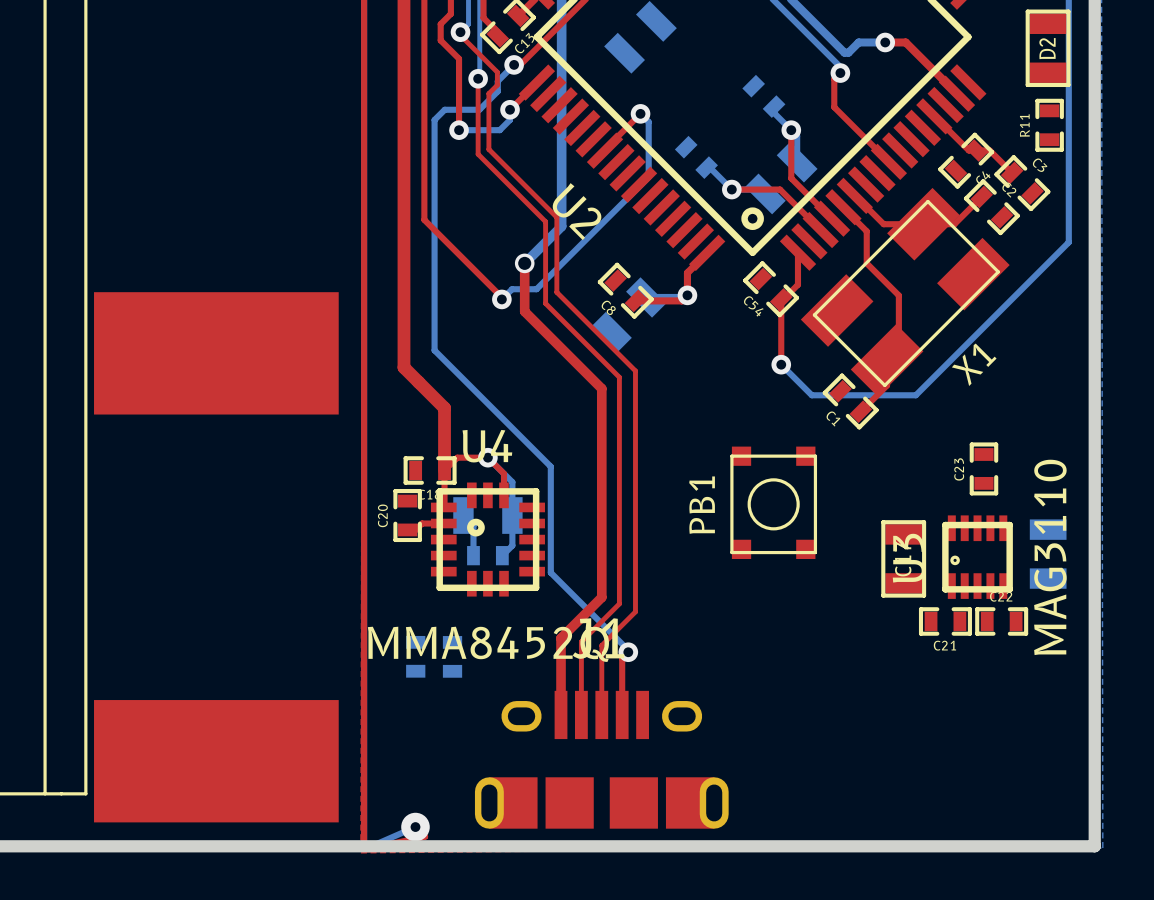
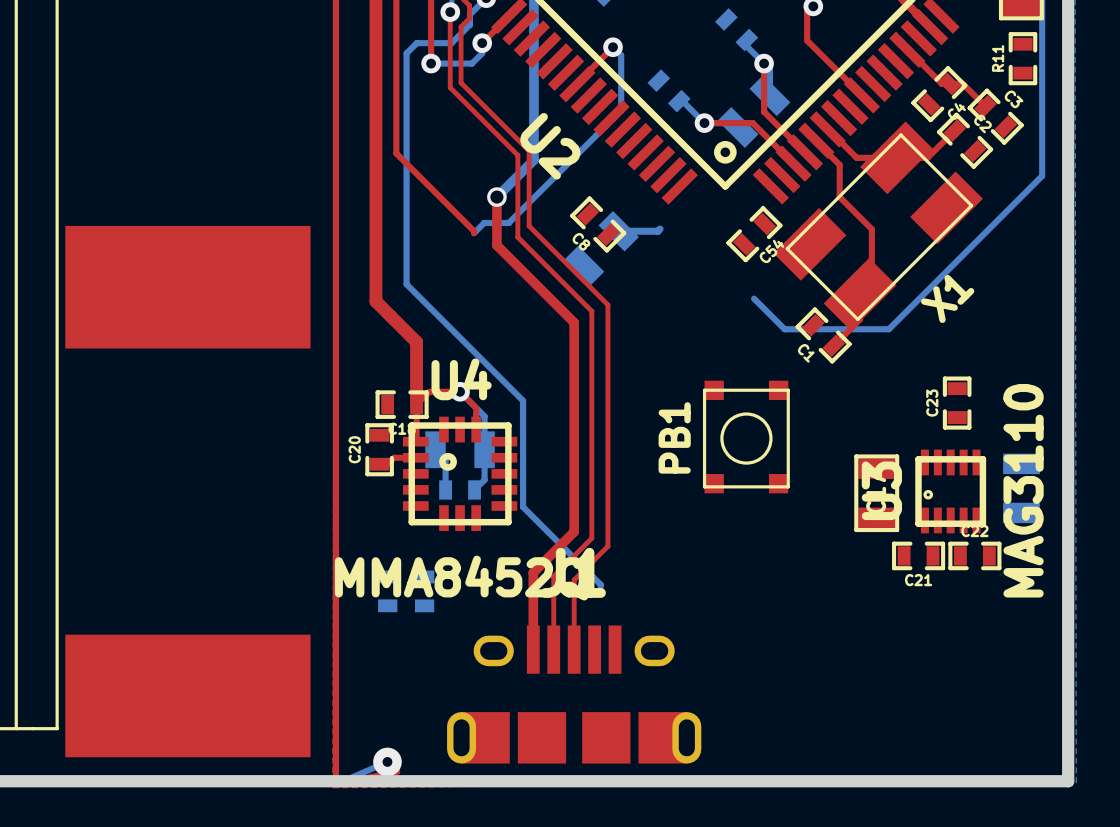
top track: (797, 252) (797, 284) (781, 299) (781, 364) -> none
top track: (707, 253) (687, 272) (687, 295) (681, 300) (635, 300) -> none
C54 rotation: 0° (771, 289) -> 90° clockwise (754, 234)
via: (687, 295) -> none
via: (501, 299) -> none
via: (781, 364) -> none
top track: (628, 652) (622, 658) (622, 714) -> none
via: (628, 652) -> none

